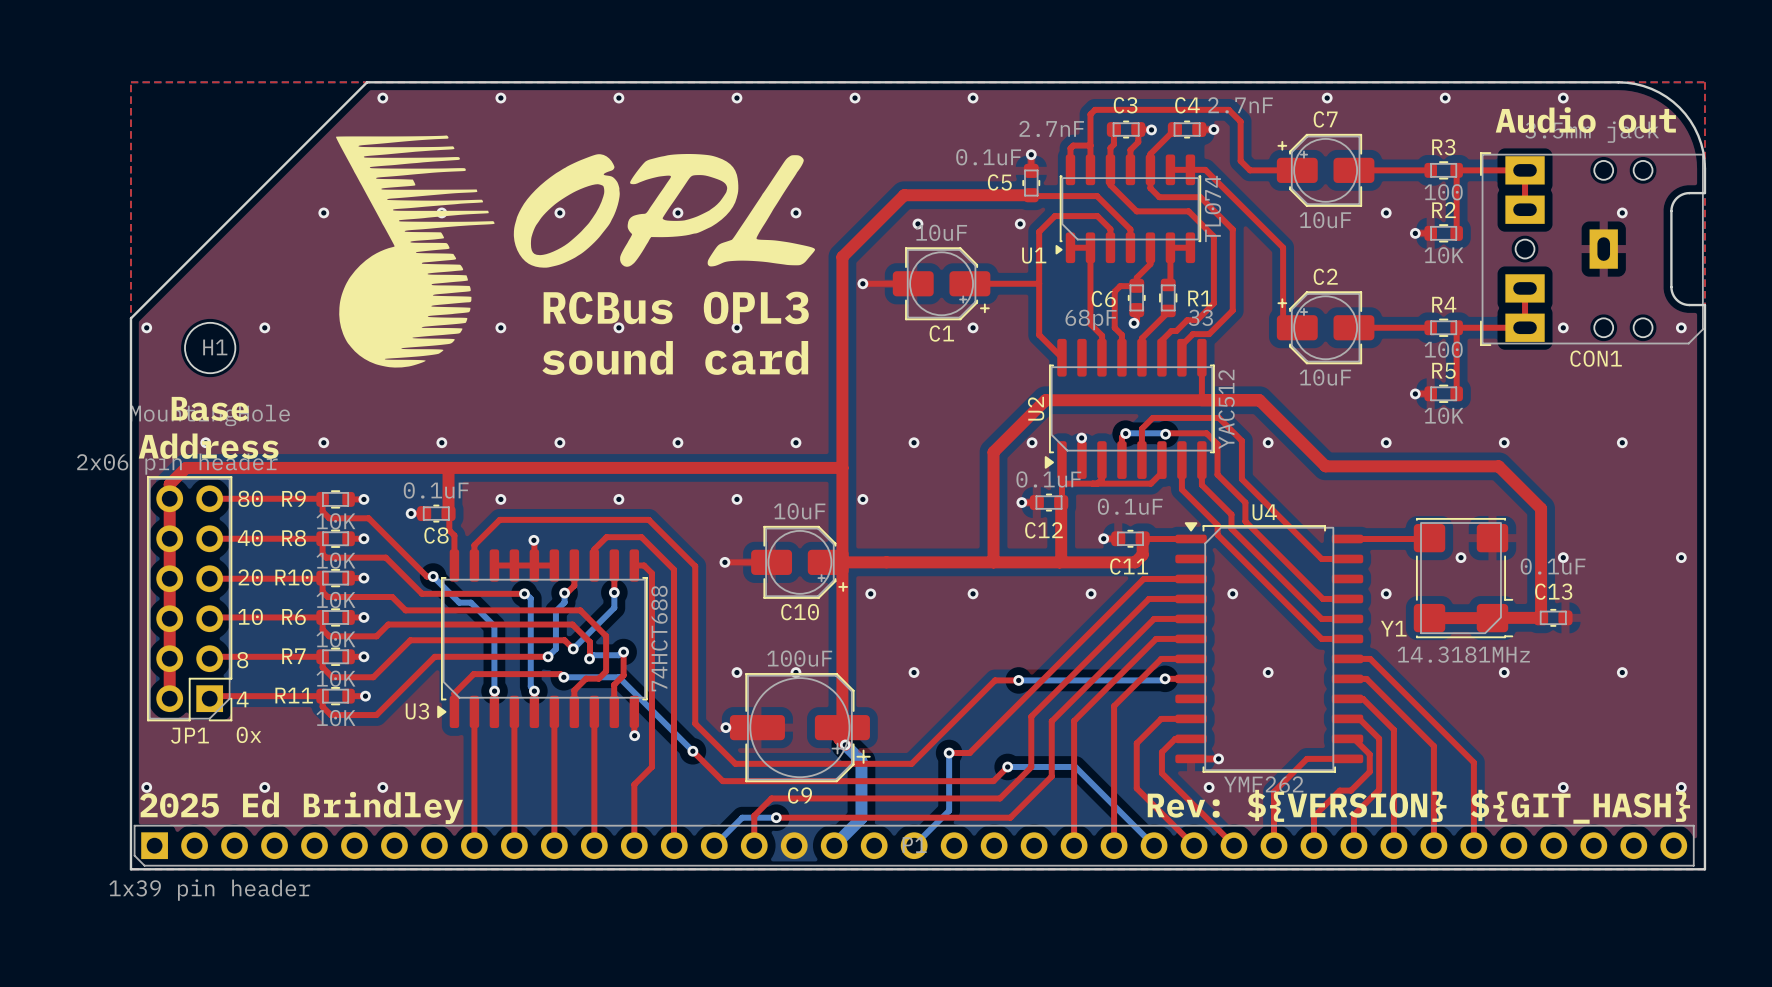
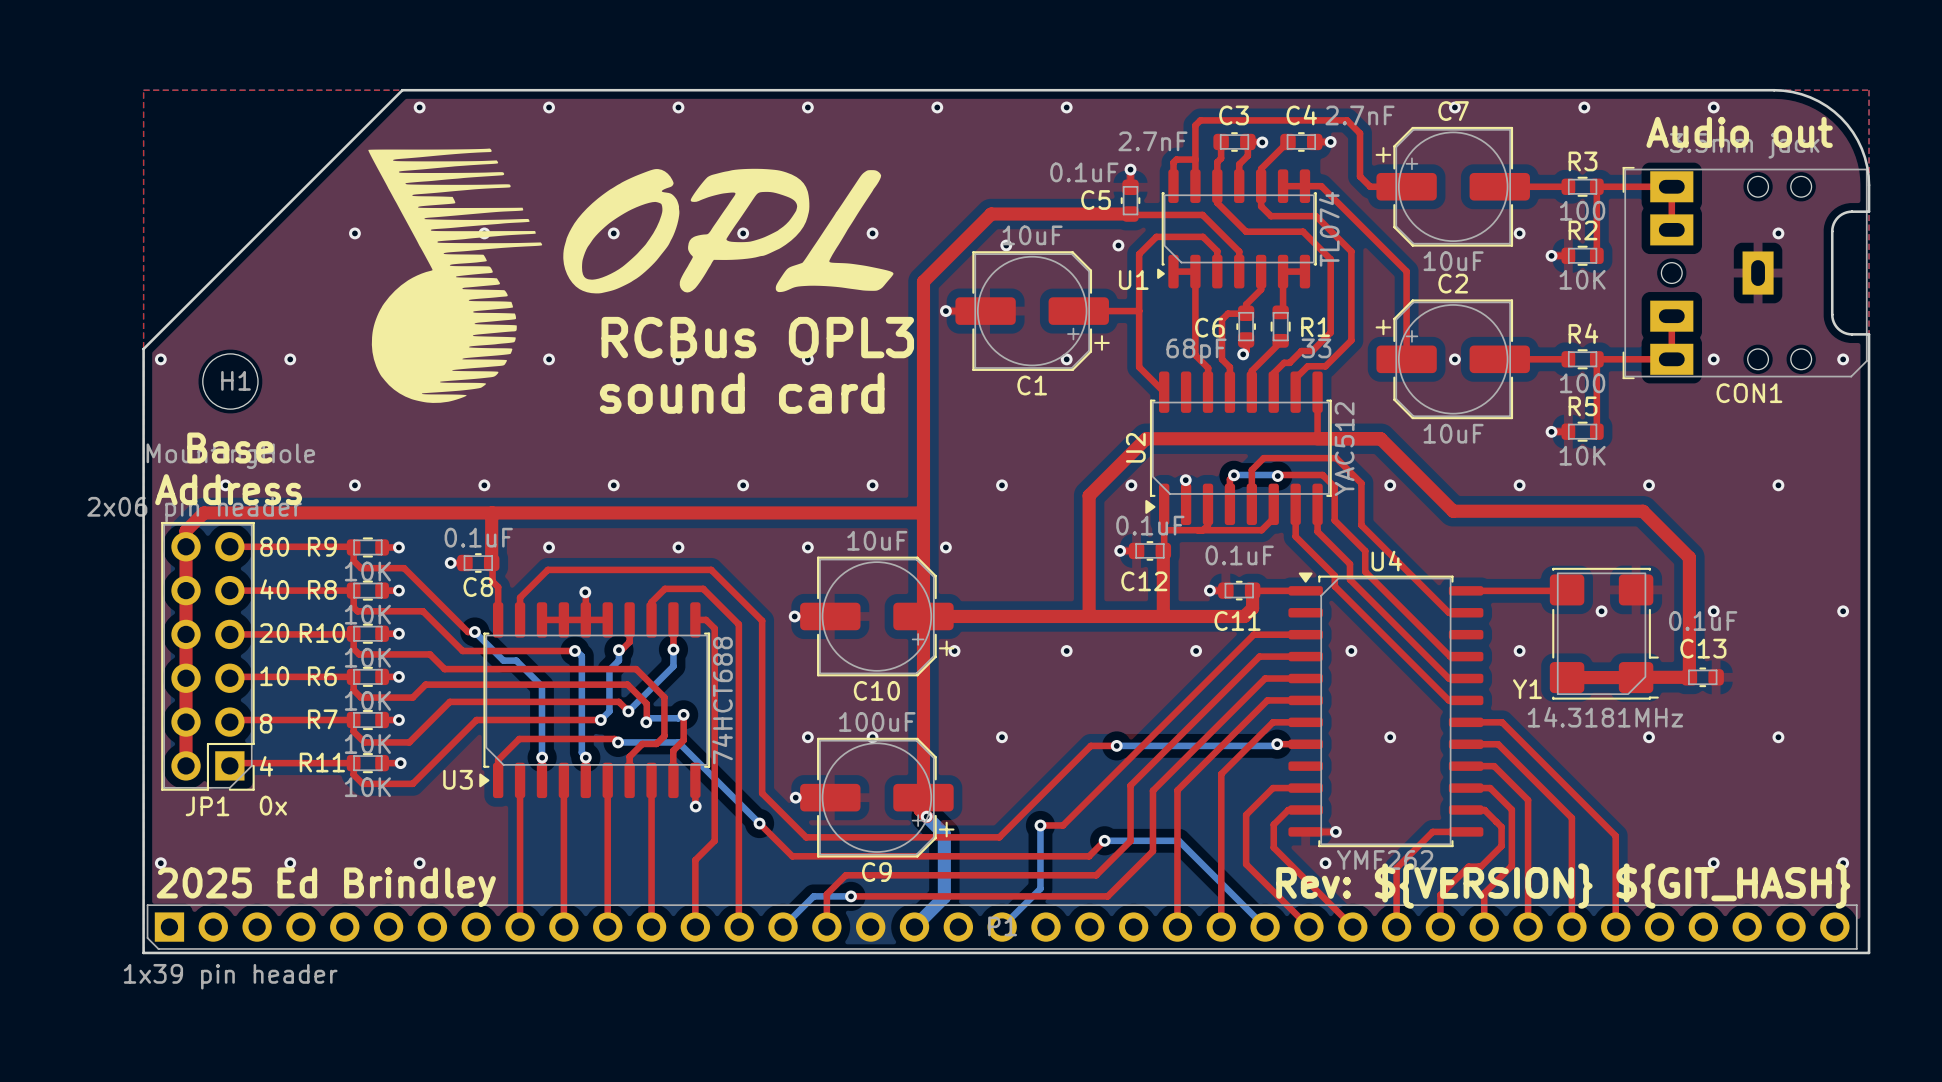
C7 footprint: [1276, 133, 1375, 207] -> [1375, 126, 1530, 247]
C1 footprint: [892, 247, 991, 321] -> [955, 251, 1110, 371]
C2 footprint: [1276, 291, 1375, 365] -> [1375, 299, 1530, 420]
via: none -> (1454, 359)
U4 footprint: [1175, 522, 1364, 773] -> [1288, 572, 1484, 848]
C10 footprint: [751, 525, 849, 599] -> [800, 556, 955, 677]

